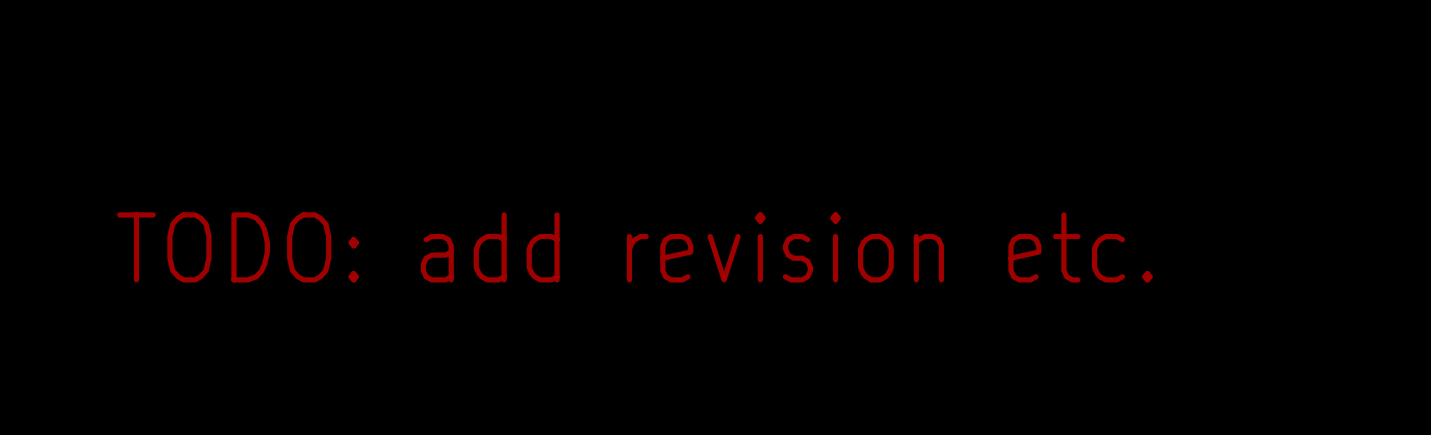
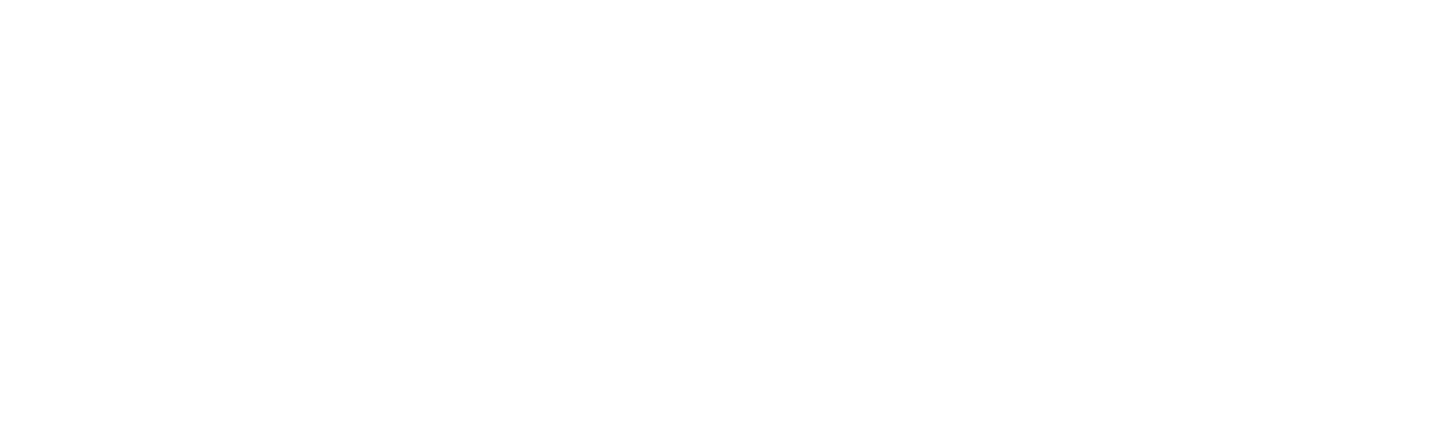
text: TODO: add revision etc. (635, 247) -> none

